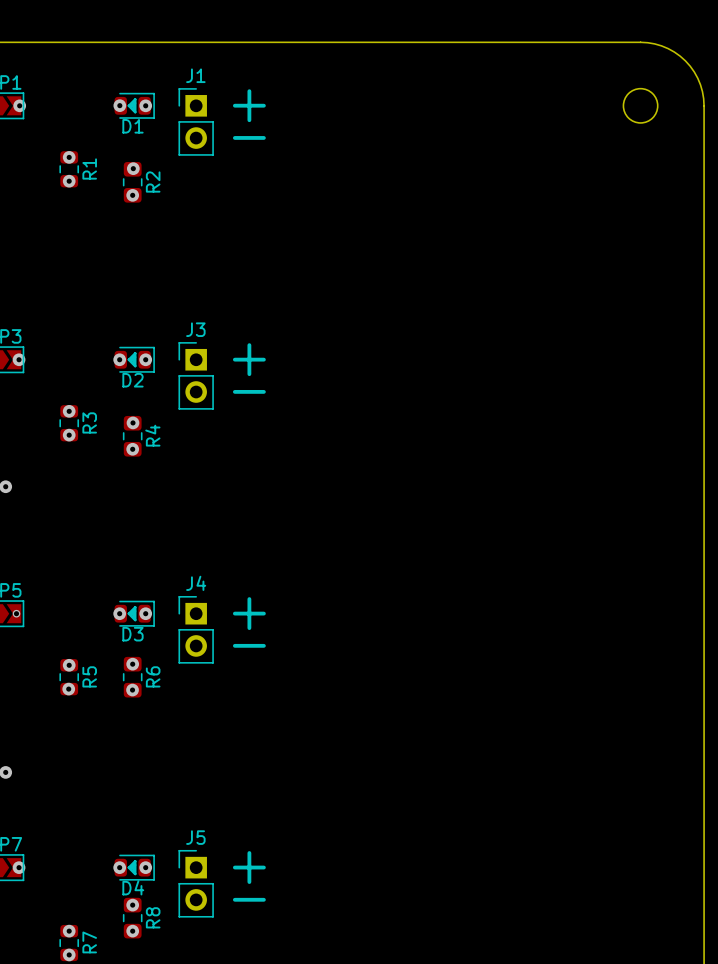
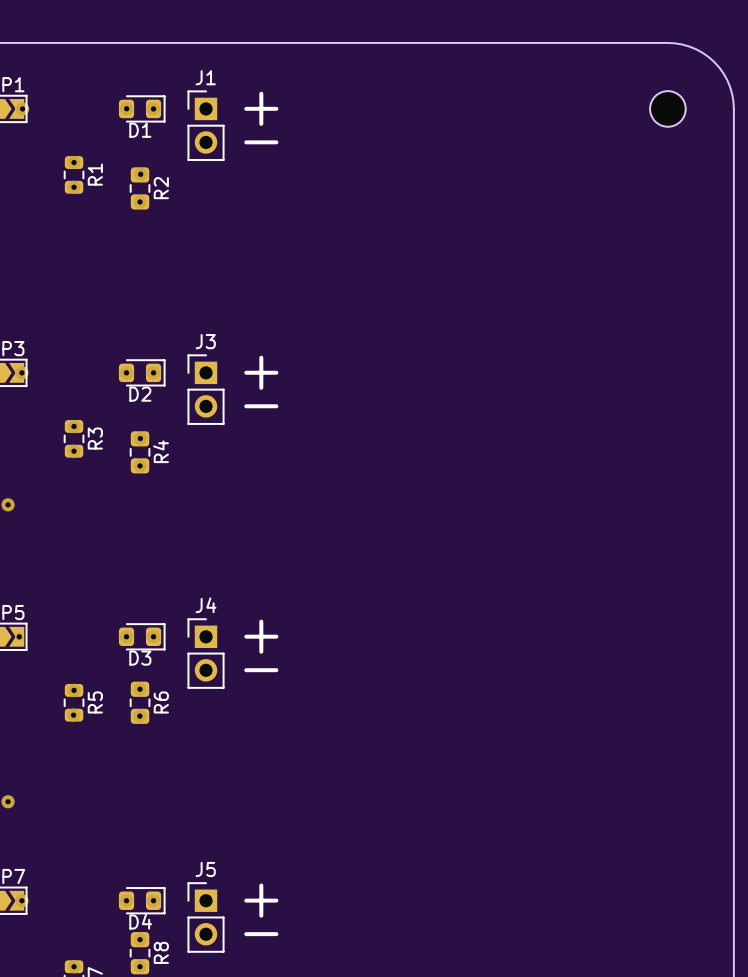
D1 footprint: [114, 92, 155, 119] -> [118, 95, 166, 123]
D2 footprint: [114, 346, 155, 373] -> [118, 359, 166, 387]
D3 footprint: [114, 600, 155, 627] -> [118, 623, 166, 651]
D4 footprint: [114, 854, 155, 881] -> [118, 887, 166, 915]

